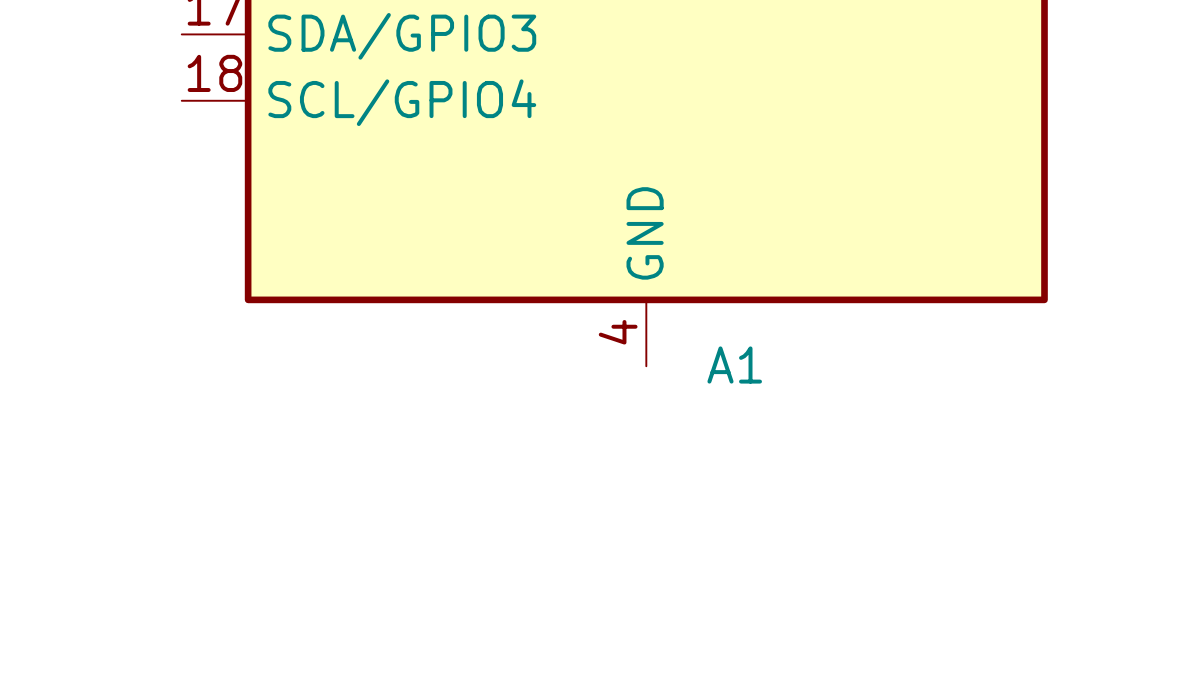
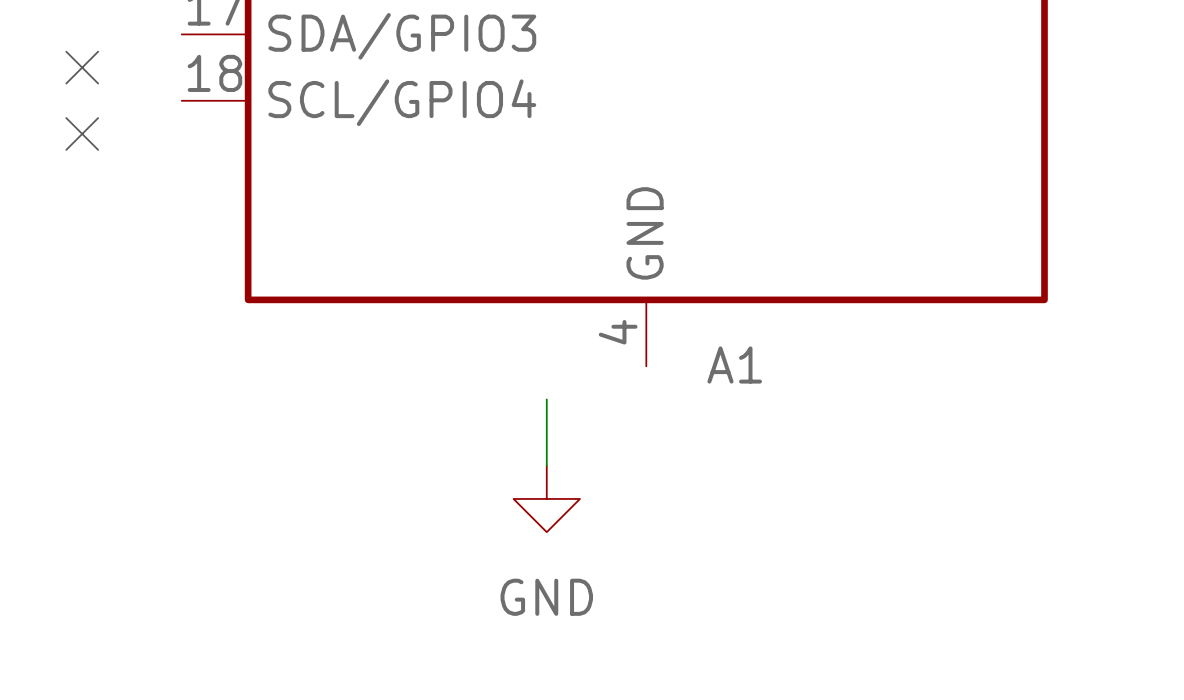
no-connect mark: none -> (82, 67)
no-connect mark: none -> (82, 133)
wire: none -> (546, 399) (546, 465)
power symbol: none -> GND (546, 498)

